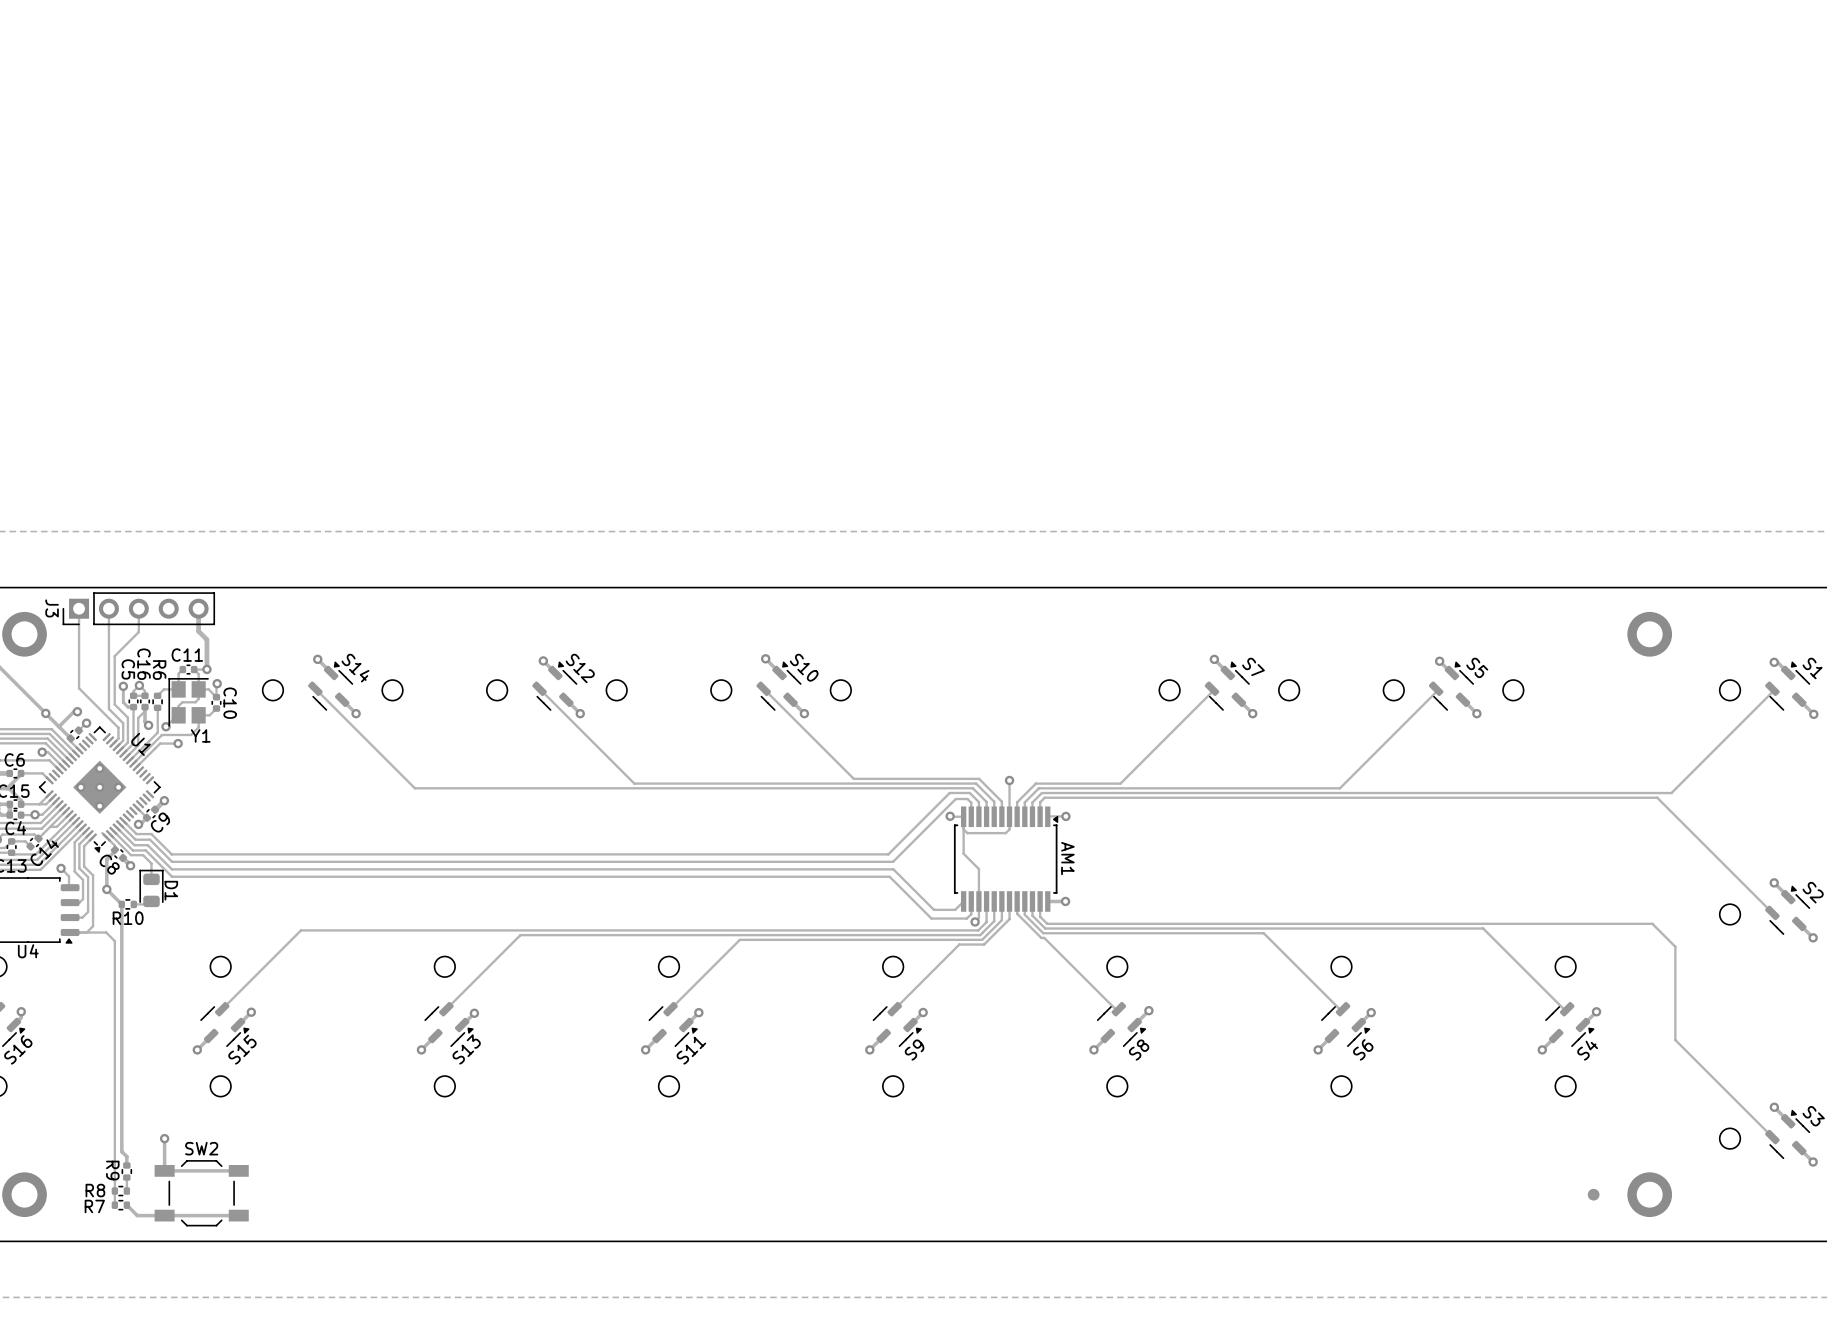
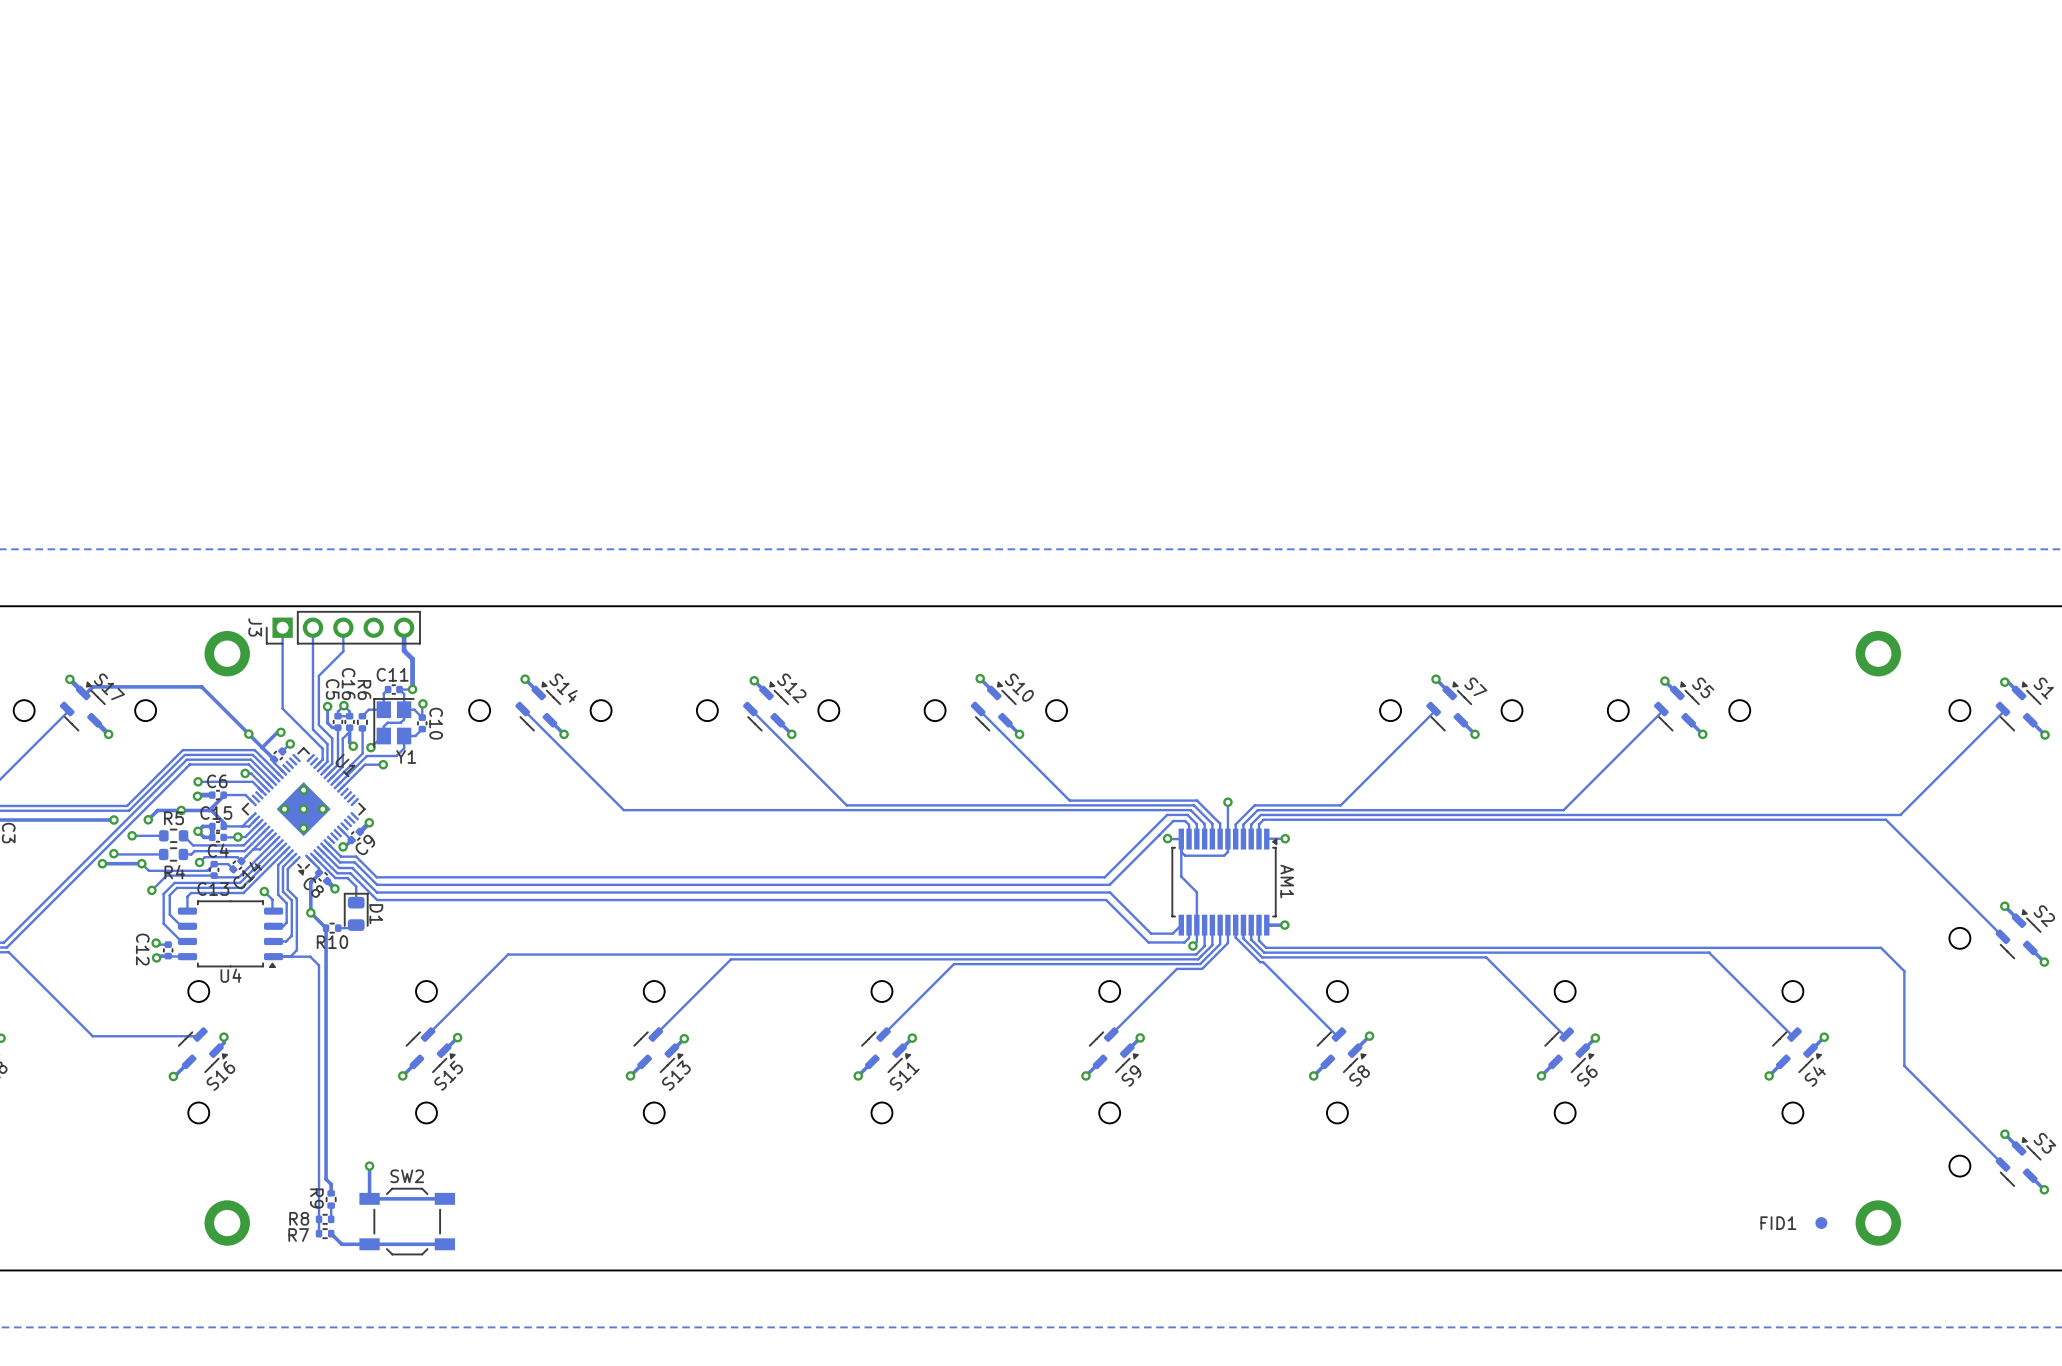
FID1 name: none -> FID1 (1778, 1223)

